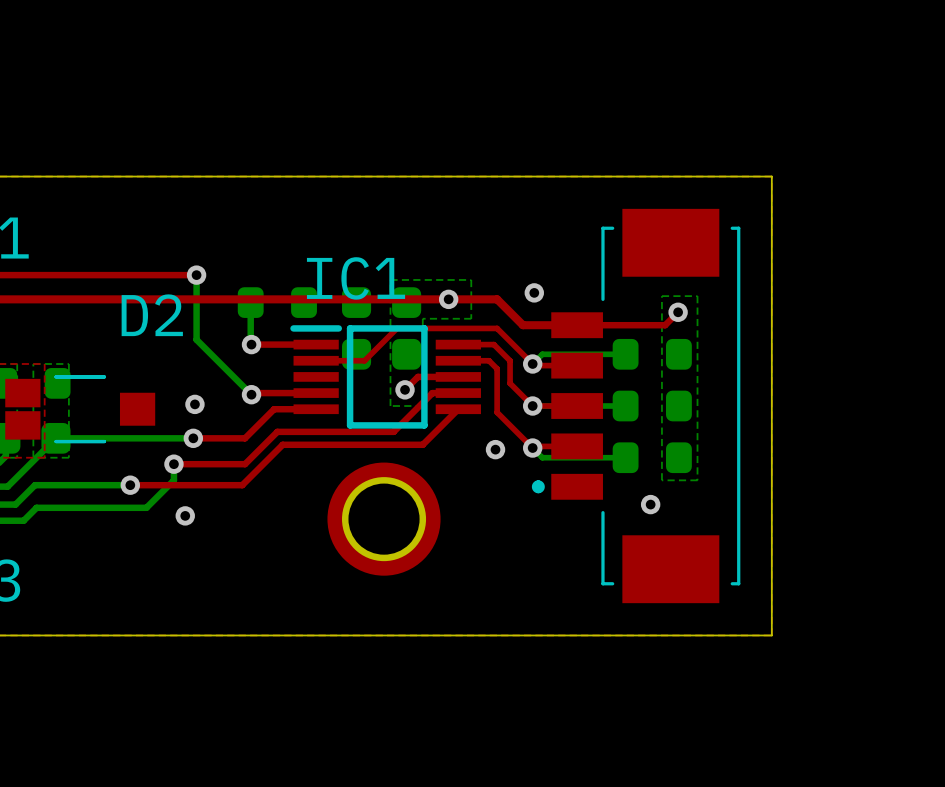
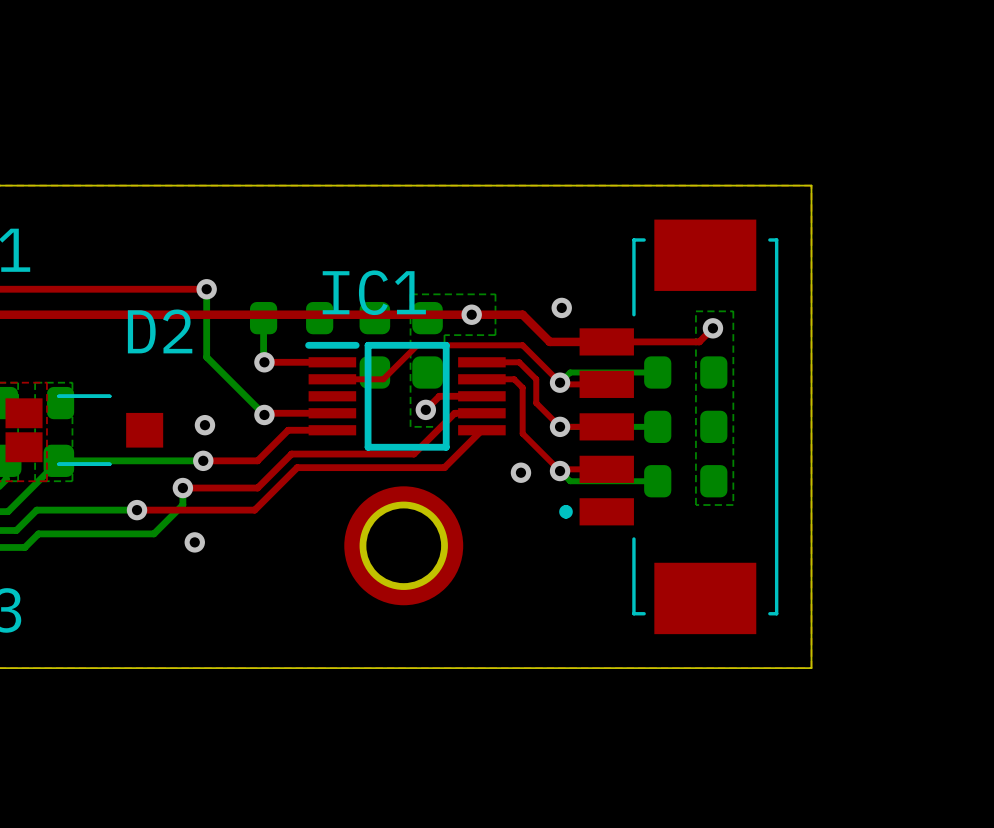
via: (650, 504) -> none

